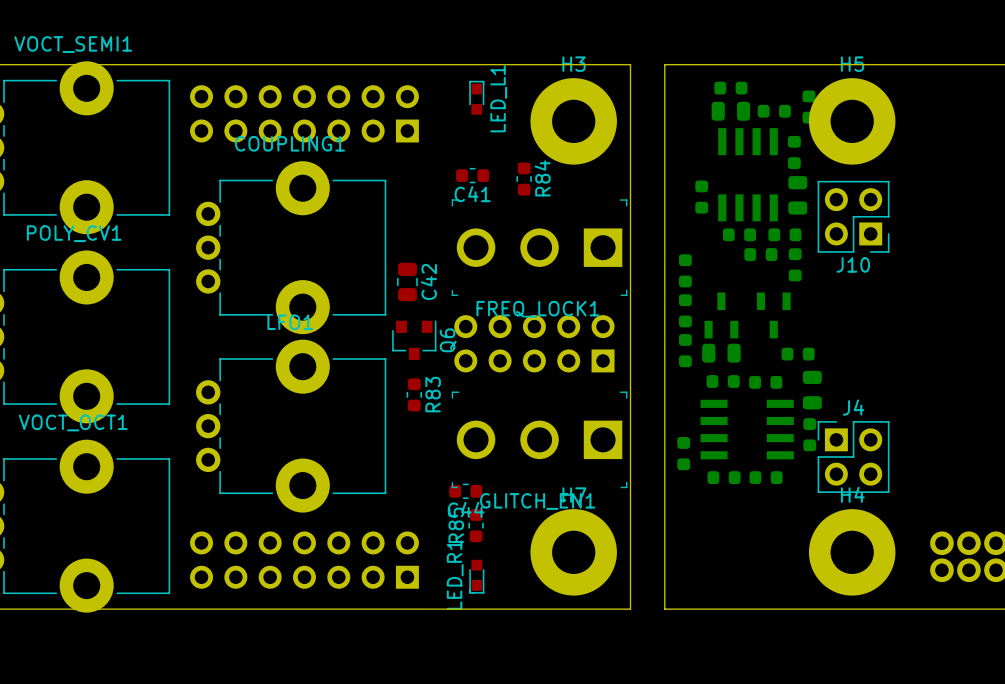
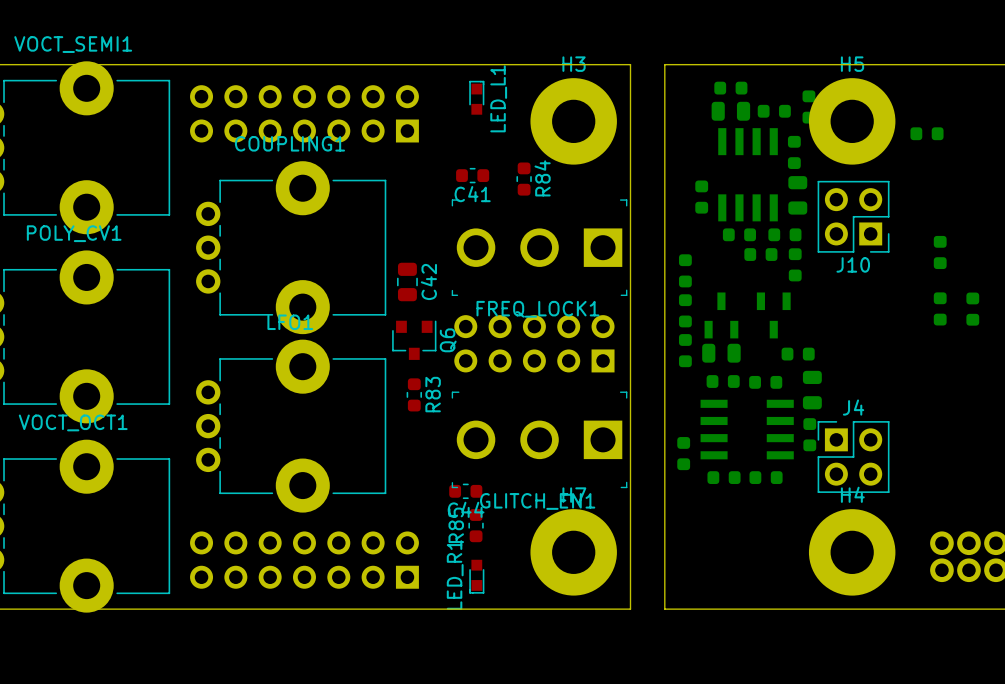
part: none -> (926, 133)
part: none -> (940, 252)
part: none -> (940, 308)
part: none -> (972, 309)

